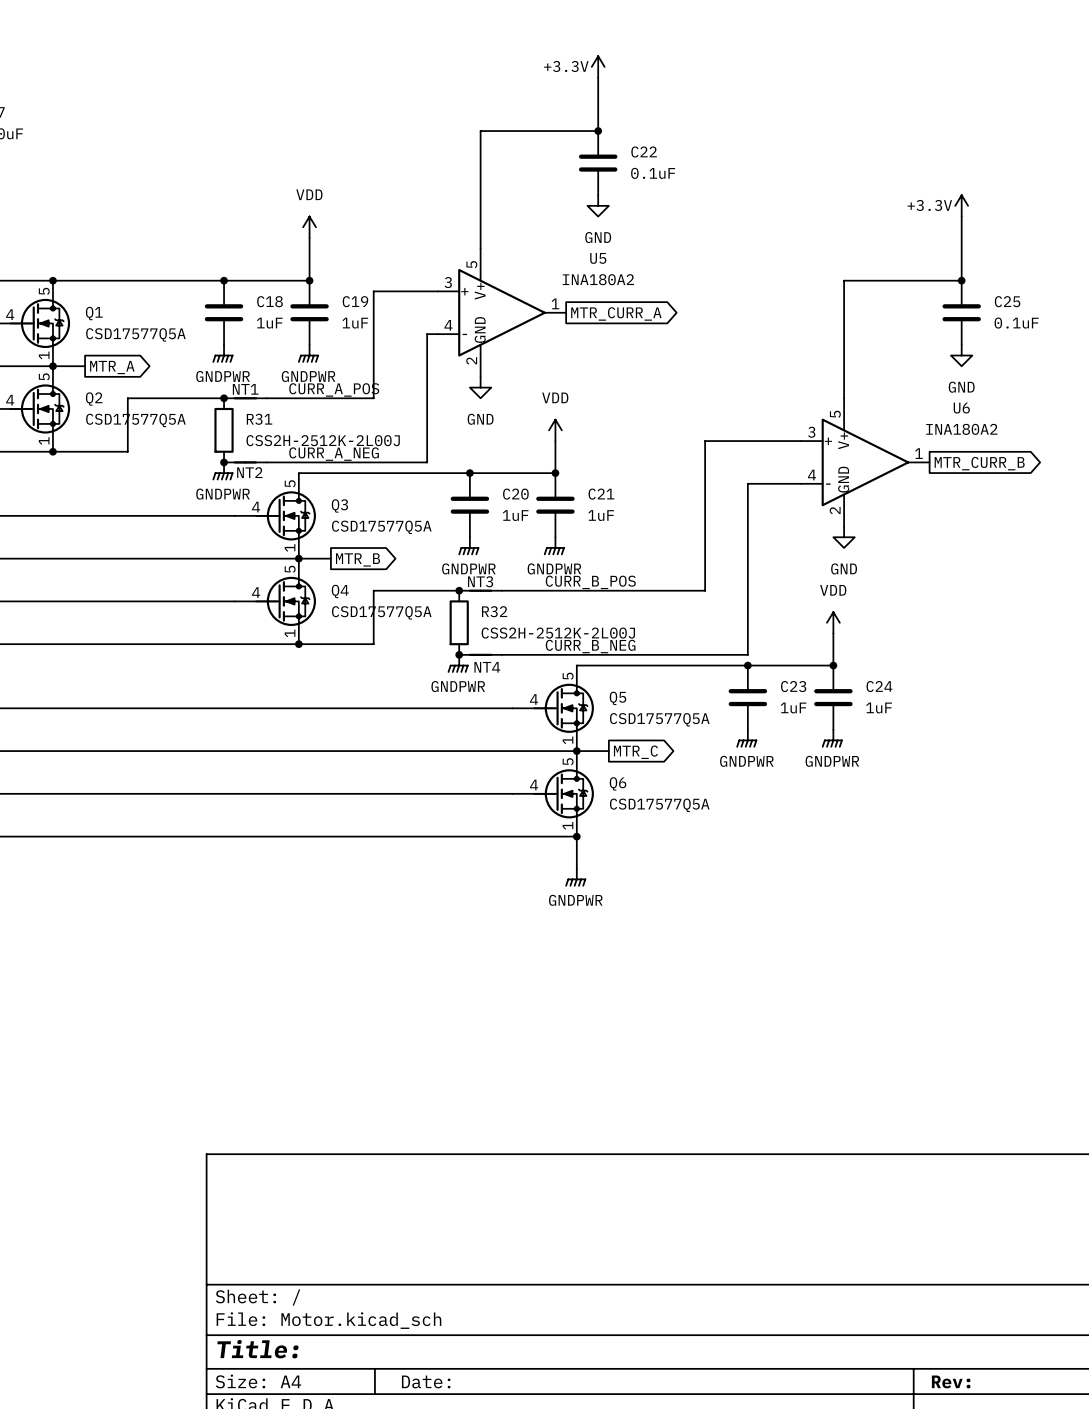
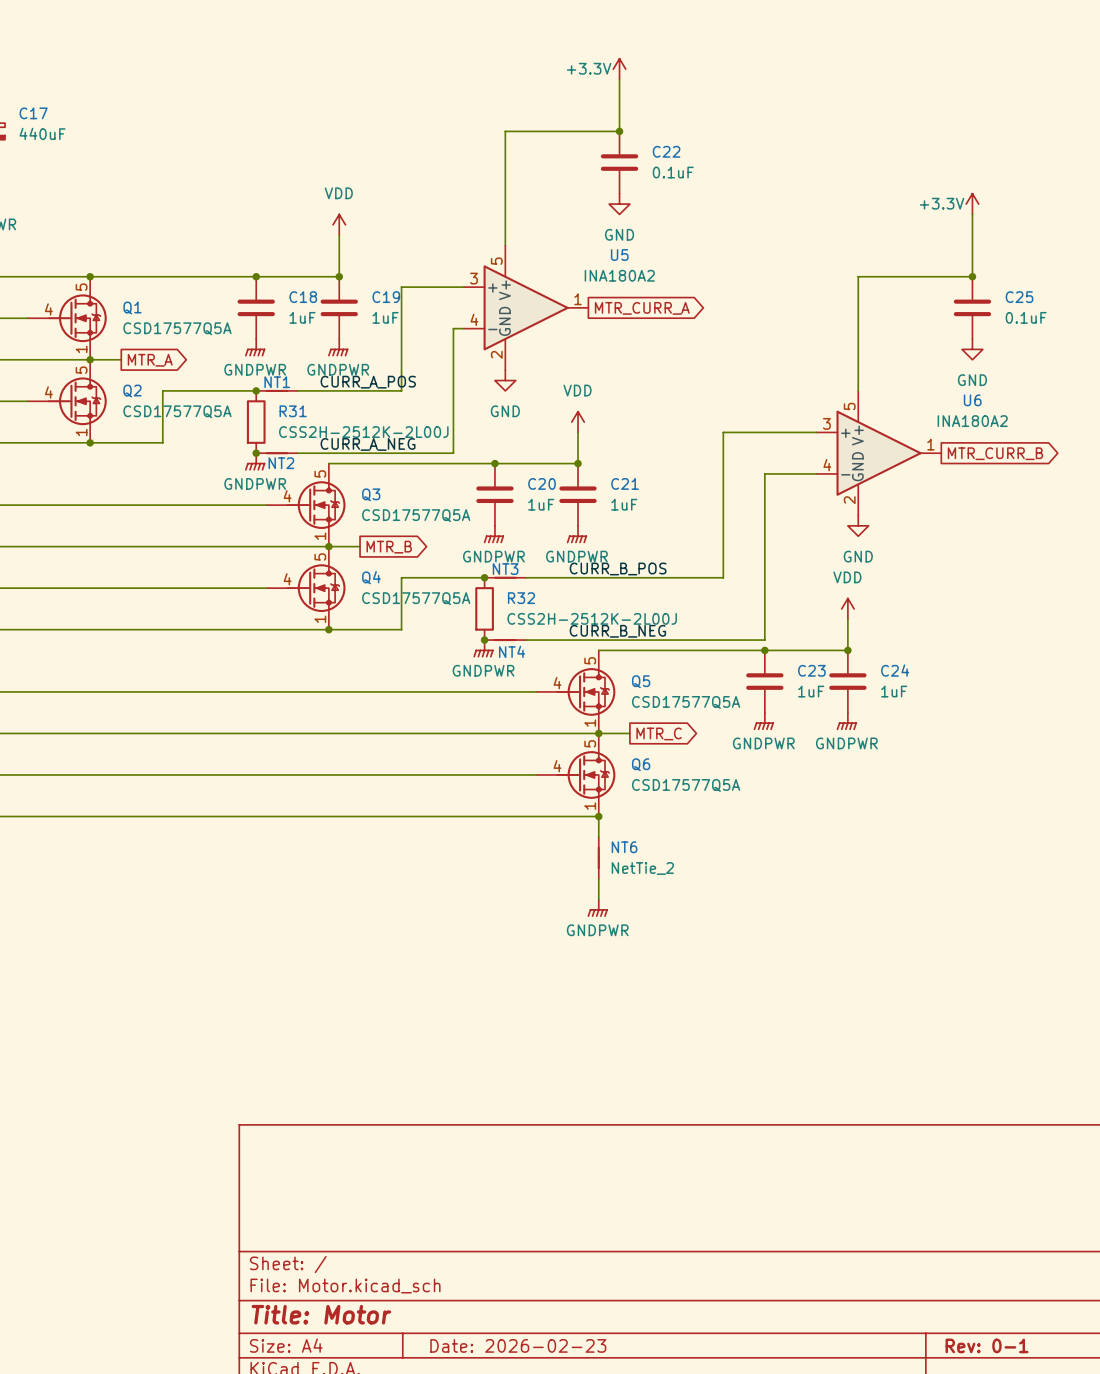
power symbol position: GNDPWR (575, 877) -> GNDPWR (597, 908)
NT6: none -> NetTie_2 (598, 858)
wire: none -> (598, 878) (598, 899)
title block: Title: (257, 1349) -> Title: Motor (321, 1314)
title block: Date: (426, 1381) -> Date: 2026-02-23 (518, 1345)
title block: Rev: (951, 1381) -> Rev: 0-1 (987, 1345)

